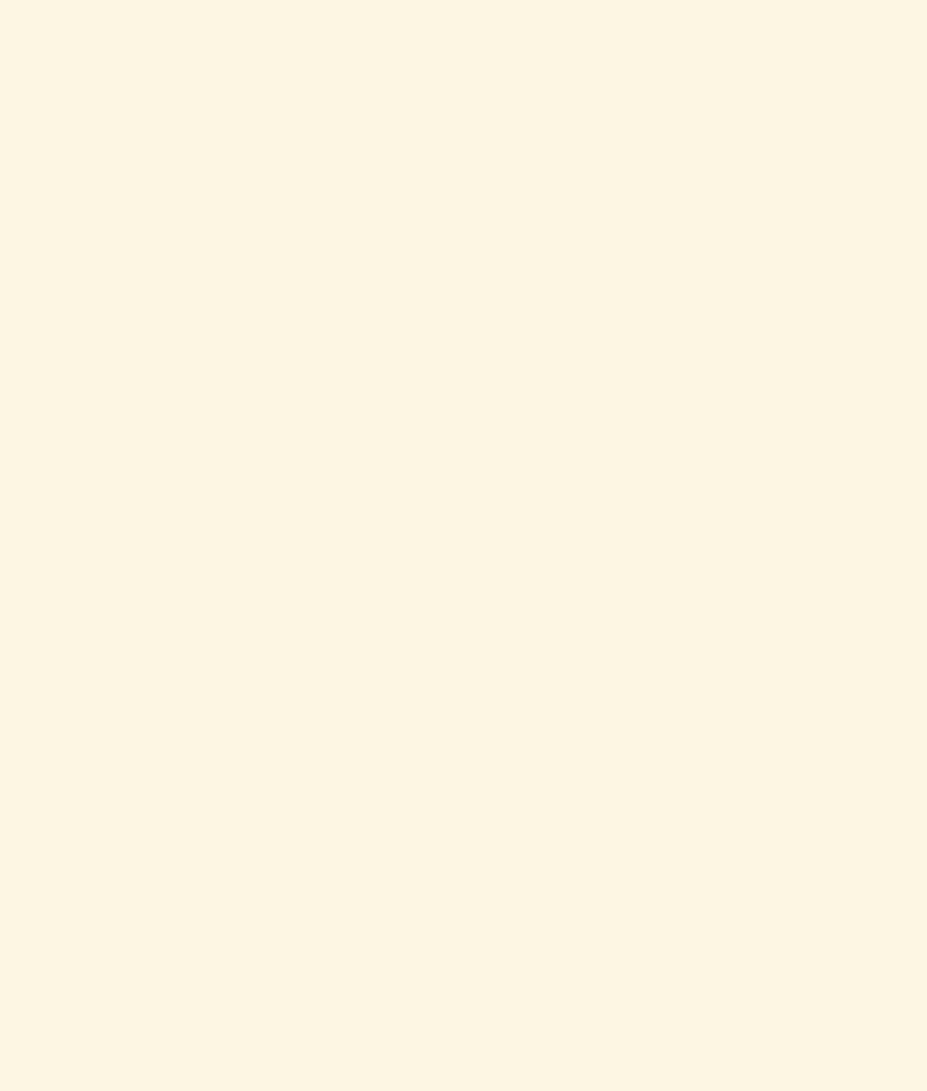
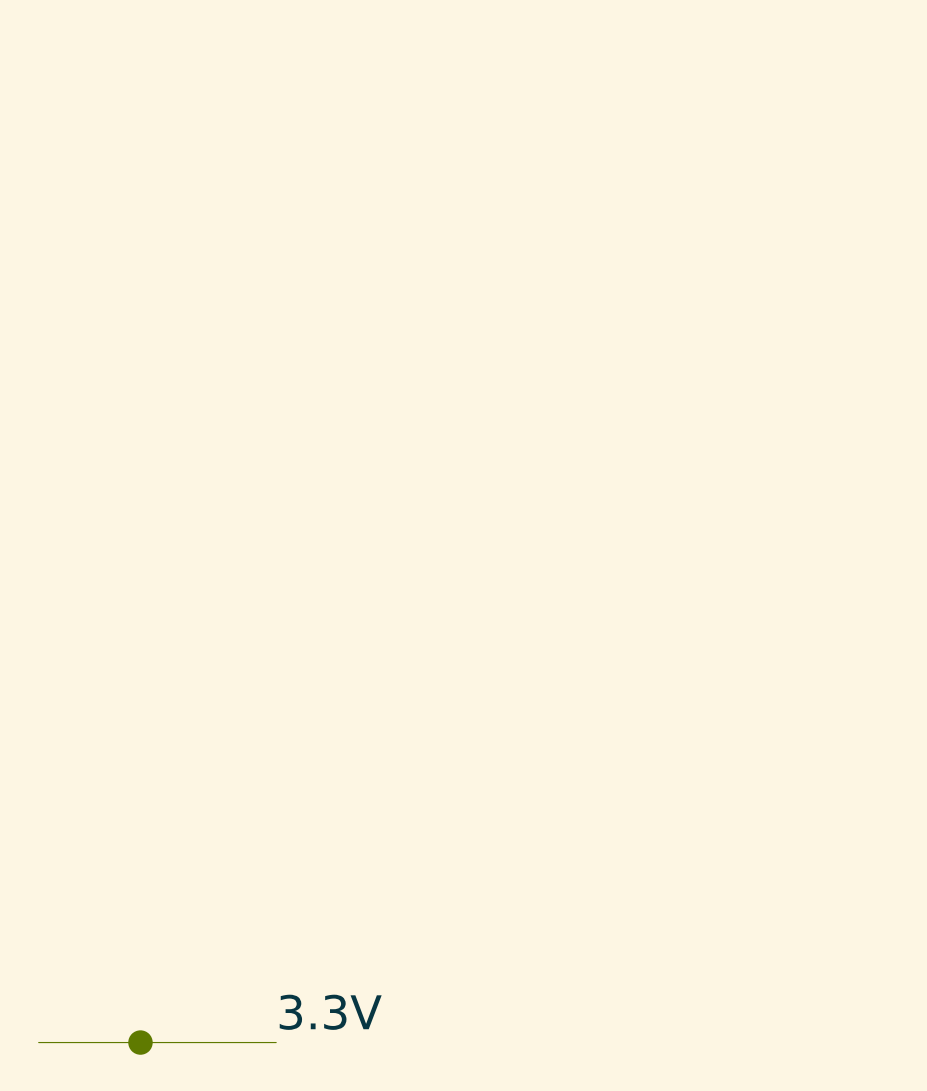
label: none -> 3.3V (330, 1012)
wire: none -> (38, 1042) (276, 1042)
junction: none -> (140, 1042)

